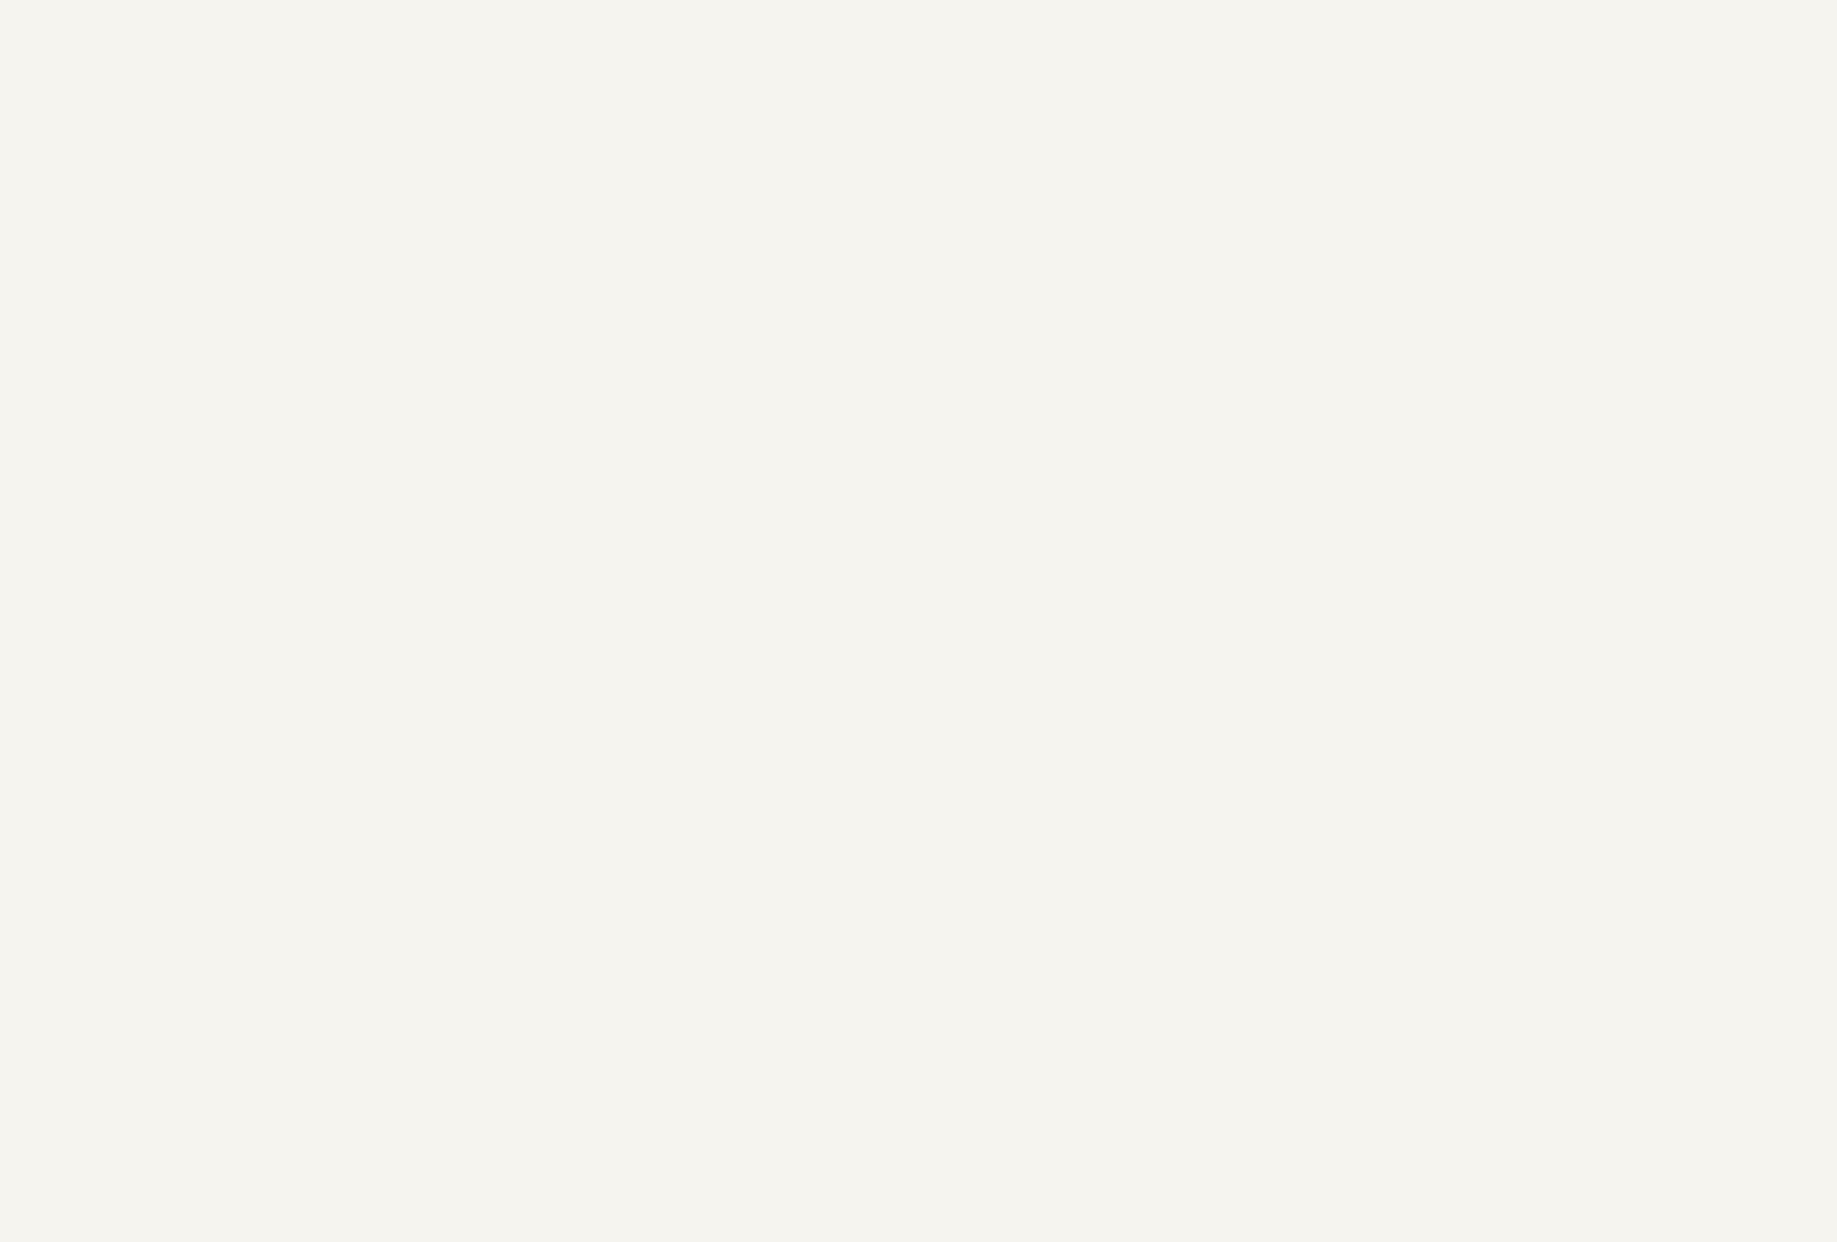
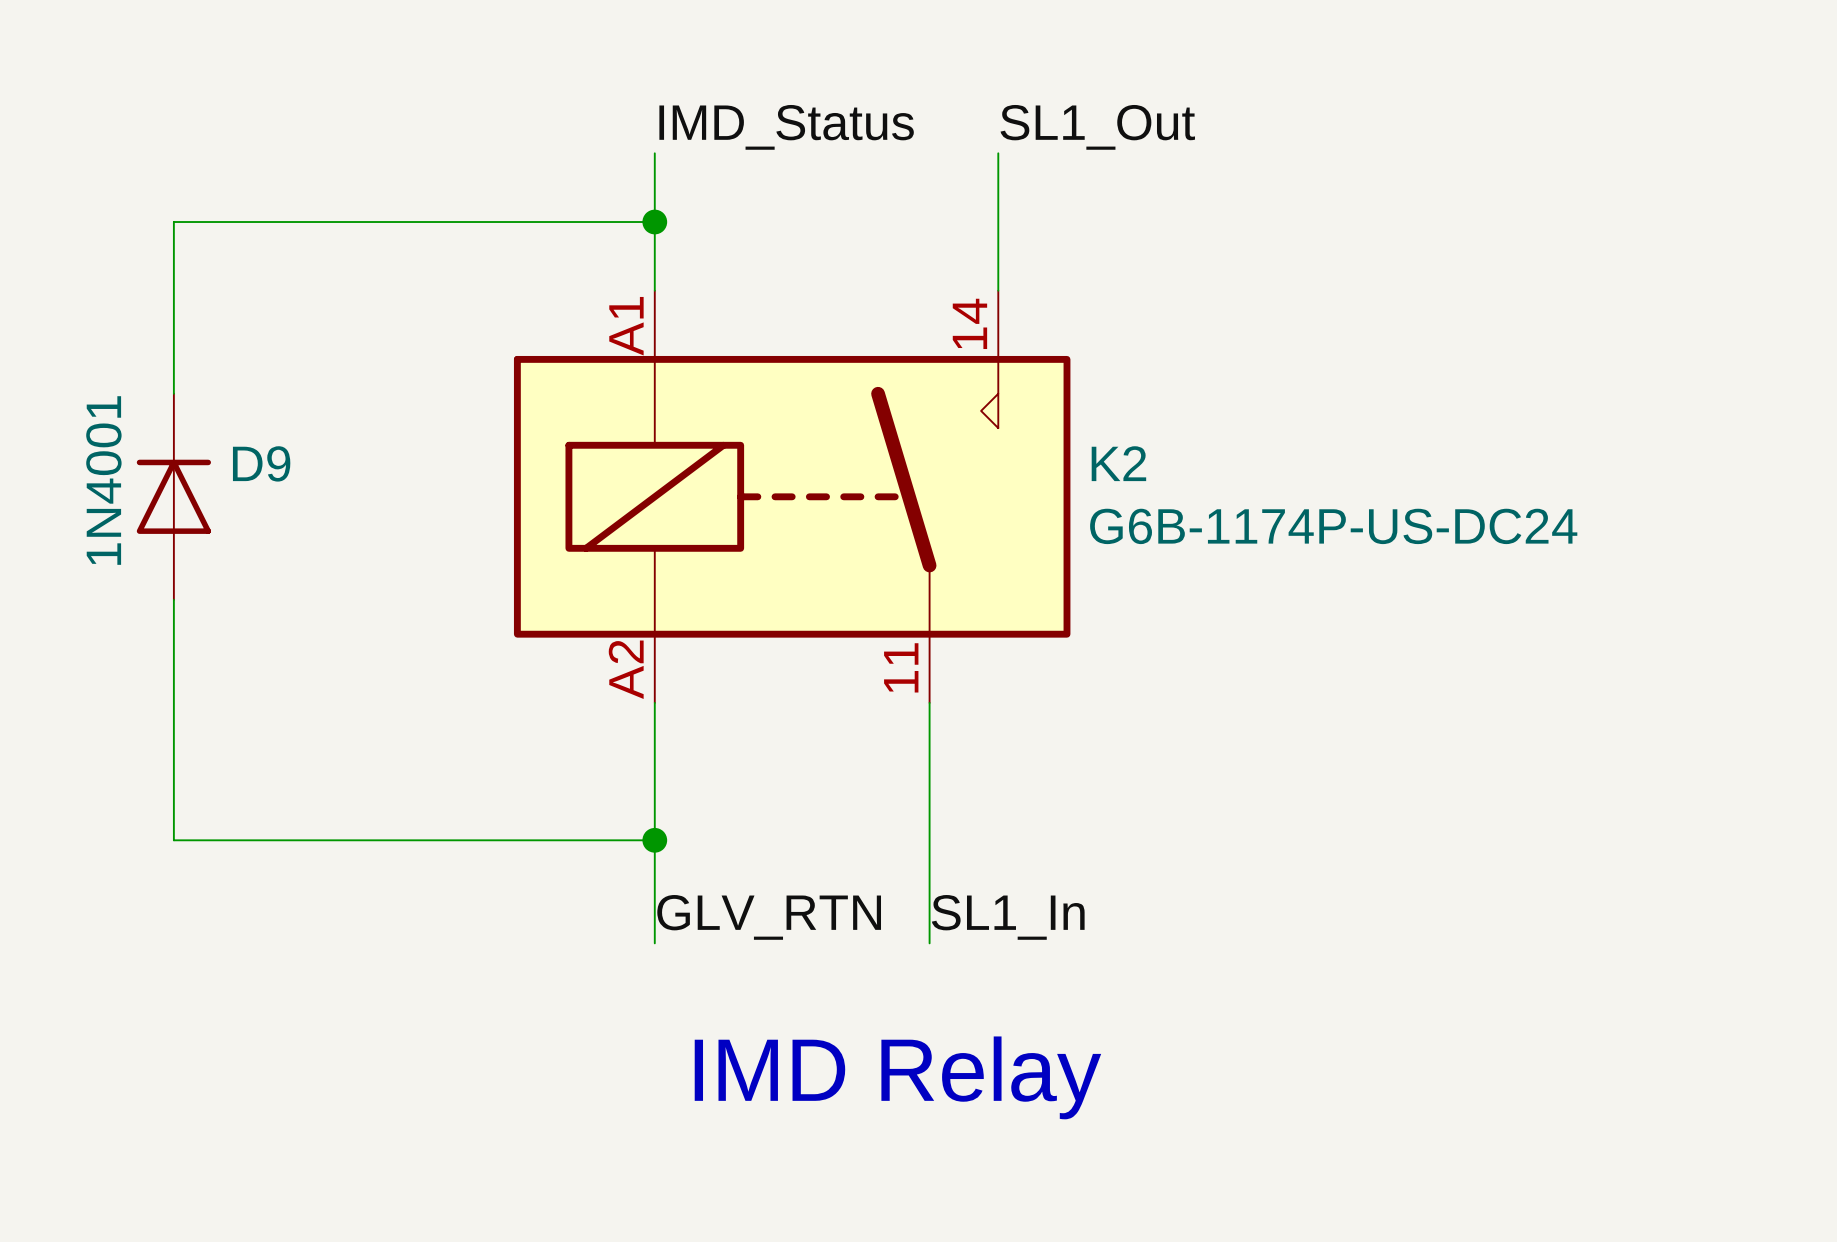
label: none -> IMD_Status (786, 127)
label: none -> SL1_Out (1097, 127)
wire: none -> (654, 153) (654, 290)
wire: none -> (998, 153) (998, 290)
wire: none -> (654, 222) (173, 222) (173, 393)
junction: none -> (654, 222)
D9: none -> 1N4001 (173, 496)
K2: none -> G6B-1174P-US-DC24 (792, 496)
wire: none -> (173, 599) (173, 840) (654, 840)
wire: none -> (654, 702) (654, 943)
wire: none -> (929, 702) (929, 943)
junction: none -> (654, 840)
label: none -> GLV_RTN (769, 917)
label: none -> SL1_In (1008, 917)
text: none -> IMD Relay (897, 1077)

